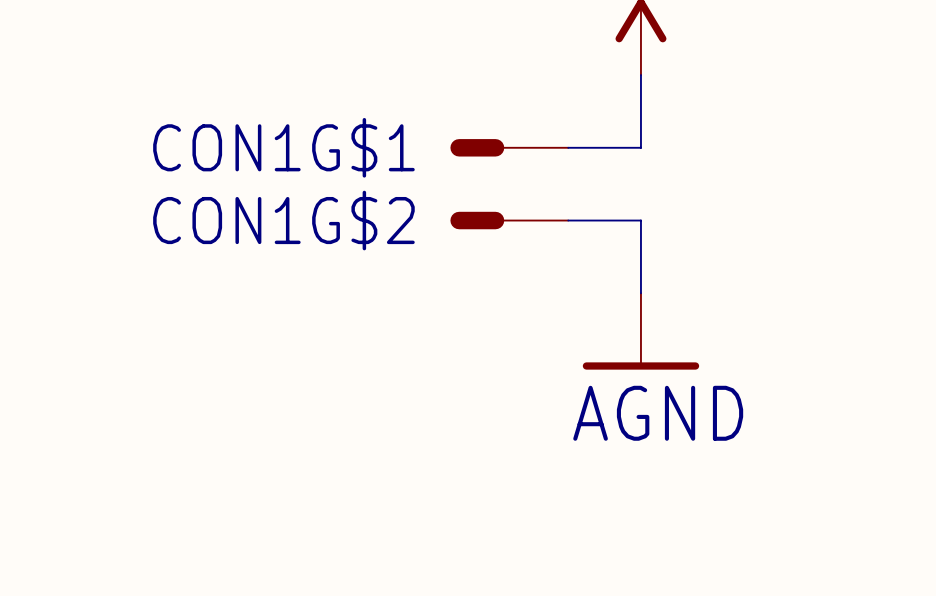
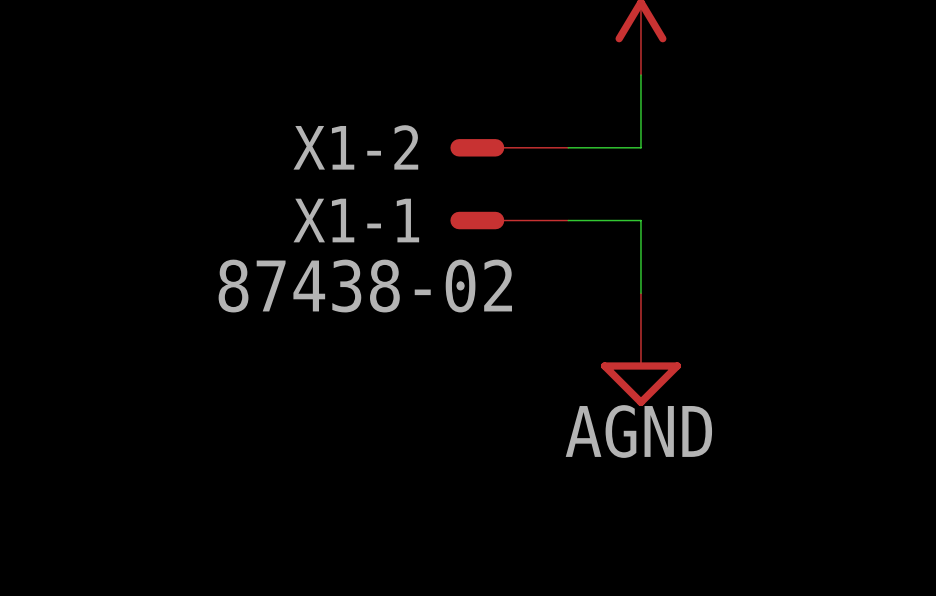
CON1G$1 name: CON1G$1 (283, 147) -> X1-2 (355, 147)
CON1G$2 name: CON1G$2 (283, 220) -> X1-1 (356, 220)
CON1G$2 value: none -> 87438-02 (365, 286)
power symbol shape: [582, 293, 700, 370] -> [600, 293, 681, 407]

